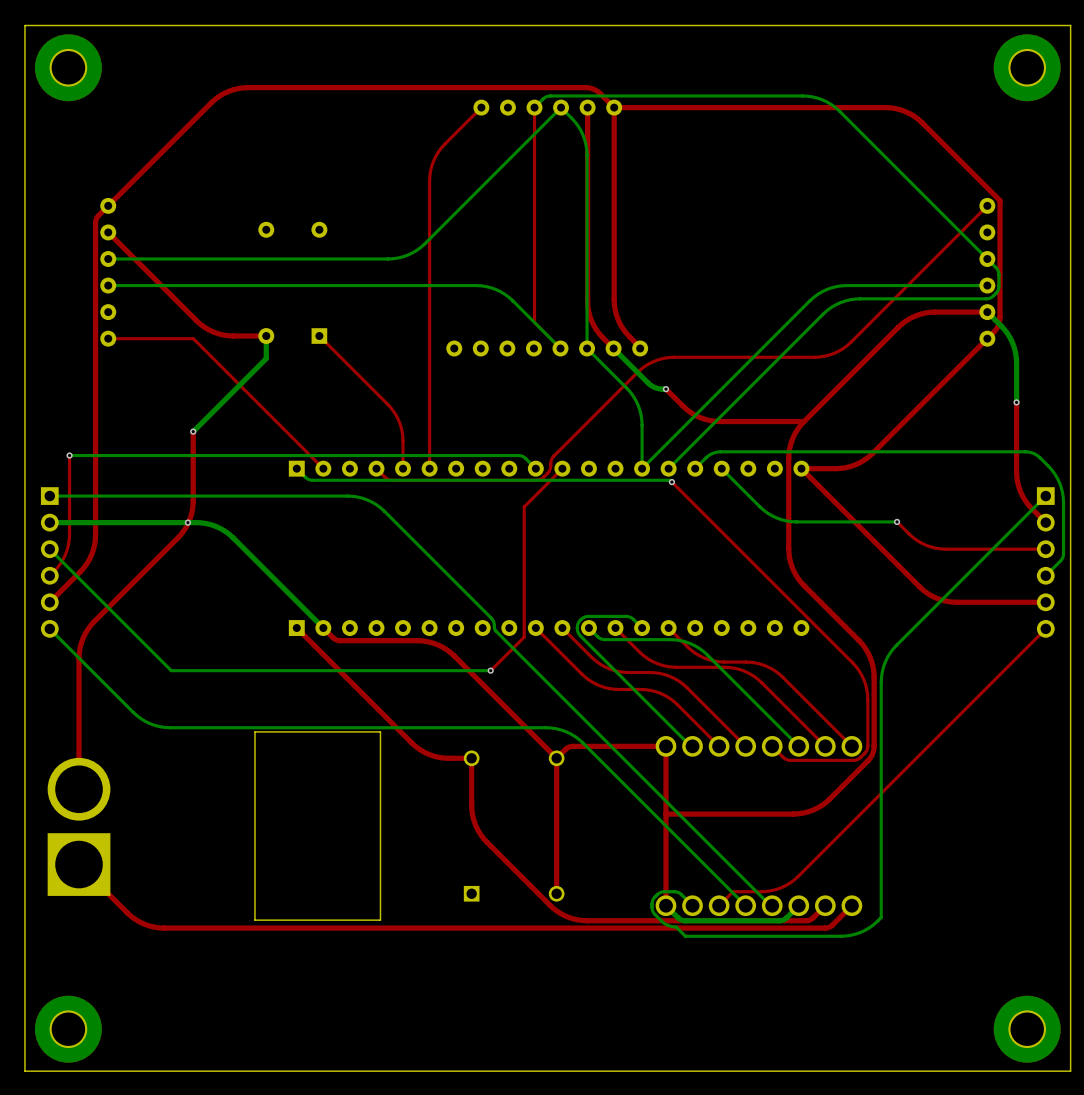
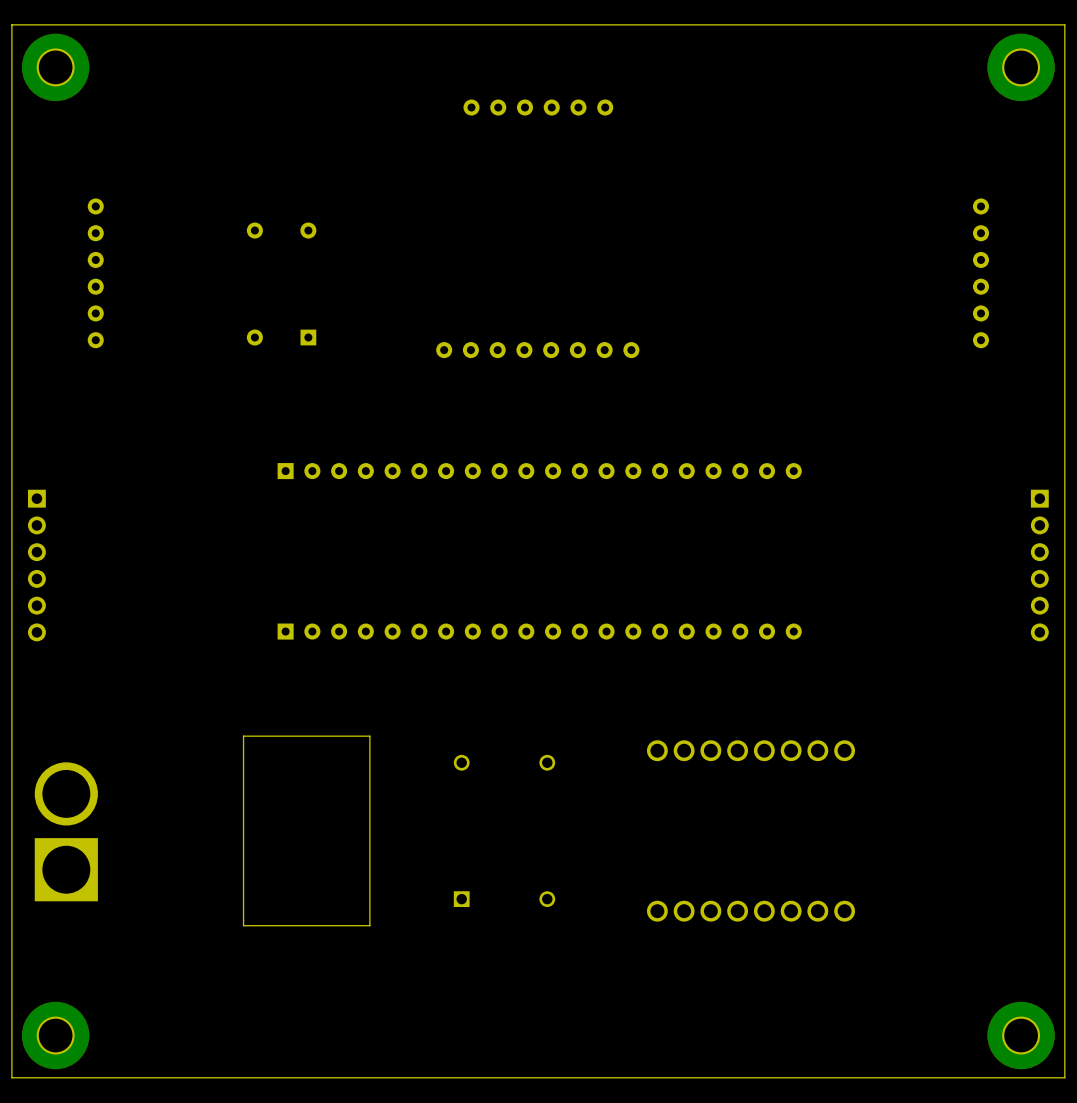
top track: (481, 107) (441, 147) (433, 161) (429, 175) (429, 468) -> none
top track: (534, 107) (534, 322) (560, 348) -> none
bottom track: (534, 107) (544, 97) (550, 95) (802, 95) (817, 98) (827, 102) (839, 111) (998, 270) (998, 290) (988, 298) (855, 299) (844, 301) (831, 307) (668, 468) -> none
top track: (587, 107) (587, 305) (591, 320) (596, 329) (613, 348) -> none
top track: (614, 107) (598, 91) (585, 87) (248, 87) (228, 91) (214, 99) (96, 219) (95, 540) (91, 554) (86, 563) (49, 602) -> none
top track: (614, 107) (614, 304) (620, 324) (640, 348) -> none
top track: (614, 107) (895, 108) (910, 113) (918, 119) (1000, 200) (1000, 317) (995, 330) (864, 459) (850, 466) (840, 468) (801, 468) (919, 586) (932, 596) (951, 602) (1045, 602) -> none
top track: (987, 205) (851, 341) (834, 353) (814, 357) (674, 357) (654, 361) (637, 372) (553, 456) (549, 471) (539, 479) (391, 480) (385, 477) (376, 468) -> none
top track: (108, 232) (204, 327) (213, 332) (228, 335) (266, 336) -> none
bottom track: (108, 258) (388, 258) (403, 256) (417, 250) (424, 243) (561, 107) (578, 126) (584, 140) (586, 150) (587, 348) (630, 392) (638, 405) (641, 420) (642, 468) (809, 300) (822, 291) (831, 287) (846, 285) (987, 285) -> none
bottom track: (108, 285) (481, 285) (495, 289) (509, 297) (560, 348) -> none
top track: (987, 312) (930, 312) (910, 318) (898, 327) (804, 421) -> none
bottom track: (987, 312) (1004, 329) (1014, 347) (1016, 362) (1016, 402) -> none
bottom track: (266, 336) (266, 358) (193, 431) -> none
top track: (319, 336) (394, 412) (402, 431) (403, 468) -> none
top track: (108, 338) (193, 338) (323, 468) -> none
bottom track: (613, 348) (649, 384) (656, 388) (665, 389) -> none
top track: (665, 389) (691, 412) (709, 420) (804, 421) -> none
via: (665, 389) -> none
top track: (1016, 402) (1017, 481) (1025, 500) (1045, 522) -> none
via: (1016, 402) -> none
top track: (804, 421) (792, 438) (789, 453) (789, 558) (792, 568) (800, 581) (858, 640) (870, 657) (874, 677) (873, 752) (868, 760) (830, 798) (817, 807) (808, 811) (793, 814) (665, 814) -> none
top track: (193, 431) (192, 506) (187, 525) (177, 537) (90, 625) (81, 643) (79, 658) (79, 789) -> none
via: (193, 431) -> none
top track: (69, 455) (68, 544) (60, 563) (49, 575) -> none
bottom track: (69, 455) (518, 455) (525, 457) (535, 468) -> none
via: (69, 455) -> none
bottom track: (296, 468) (306, 478) (312, 480) (670, 480) (671, 482) -> none
top track: (562, 468) (524, 506) (524, 637) (490, 670) -> none
bottom track: (695, 468) (709, 455) (720, 451) (1030, 452) (1040, 457) (1054, 473) (1059, 482) (1063, 497) (1063, 555) (1045, 575) -> none
bottom track: (721, 468) (763, 510) (781, 519) (796, 521) (897, 521) -> none
top track: (671, 482) (852, 662) (863, 679) (867, 694) (867, 746) (859, 758) (853, 760) (789, 760) (783, 758) (772, 746) -> none
via: (671, 482) -> none
bottom track: (49, 496) (347, 496) (357, 497) (372, 502) (384, 511) (491, 618) (495, 631) (772, 905) -> none
bottom track: (1045, 496) (896, 645) (885, 662) (881, 682) (881, 917) (865, 930) (846, 936) (685, 936) (676, 927) (662, 922) (653, 913) (651, 907) (654, 897) (664, 891) (679, 892) (692, 905) -> none
top track: (897, 521) (916, 540) (935, 548) (1045, 549) -> none
via: (897, 521) -> none
bottom track: (49, 522) (196, 522) (216, 526) (233, 537) (323, 628) -> none
via: (187, 522) -> none
bottom track: (49, 549) (171, 670) (490, 670) -> none
bottom track: (49, 628) (137, 715) (150, 723) (160, 726) (546, 727) (566, 731) (583, 743) (745, 905) -> none
top track: (296, 628) (415, 746) (428, 754) (438, 757) (471, 758) (471, 810) (477, 829) (486, 842) (550, 905) (562, 914) (571, 918) (587, 920) (805, 920) (812, 918) (825, 905) -> none
top track: (323, 628) (338, 640) (422, 640) (442, 646) (454, 656) (556, 758) -> none
top track: (535, 628) (589, 680) (608, 688) (645, 689) (665, 695) (677, 704) (719, 746) -> none
top track: (562, 628) (595, 660) (608, 668) (623, 672) (660, 673) (679, 681) (745, 746) -> none
bottom track: (588, 628) (602, 639) (675, 639) (695, 645) (707, 654) (798, 746) -> none
top track: (615, 628) (643, 655) (661, 665) (676, 667) (729, 667) (749, 673) (761, 682) (825, 746) -> none
bottom track: (642, 628) (631, 618) (626, 616) (586, 616) (579, 620) (577, 627) (580, 635) (692, 746) -> none
top track: (668, 628) (691, 650) (704, 658) (719, 661) (756, 663) (774, 670) (851, 746) -> none
top track: (1045, 628) (794, 879) (781, 887) (771, 890) (733, 891) (719, 905) -> none
via: (490, 670) -> none
top track: (556, 758) (566, 748) (571, 746) (665, 746) (665, 905) -> none
top track: (556, 758) (556, 893) -> none
top track: (79, 864) (131, 916) (144, 924) (159, 927) (825, 928) (831, 925) (851, 905) -> none
bottom track: (798, 905) (786, 918) (779, 920) (684, 920) (678, 918) (665, 905) -> none

